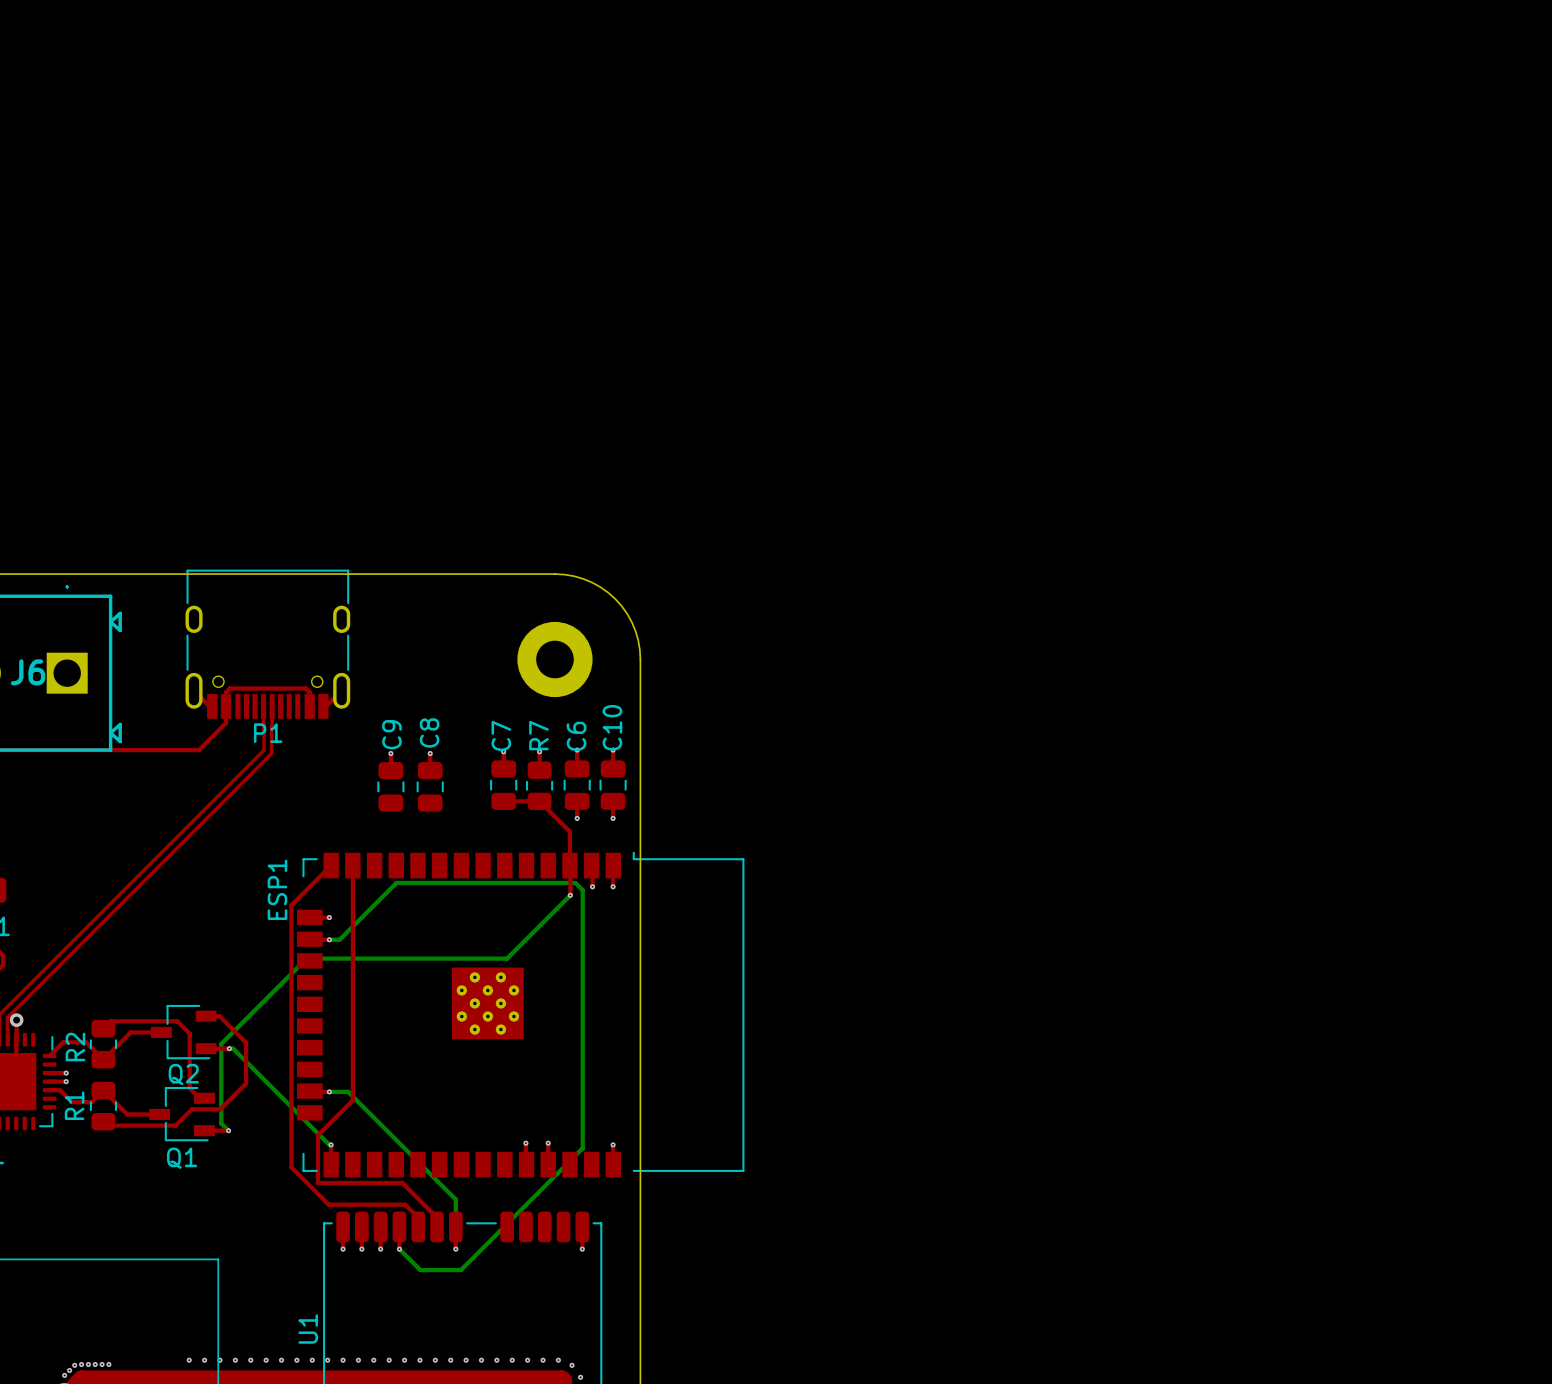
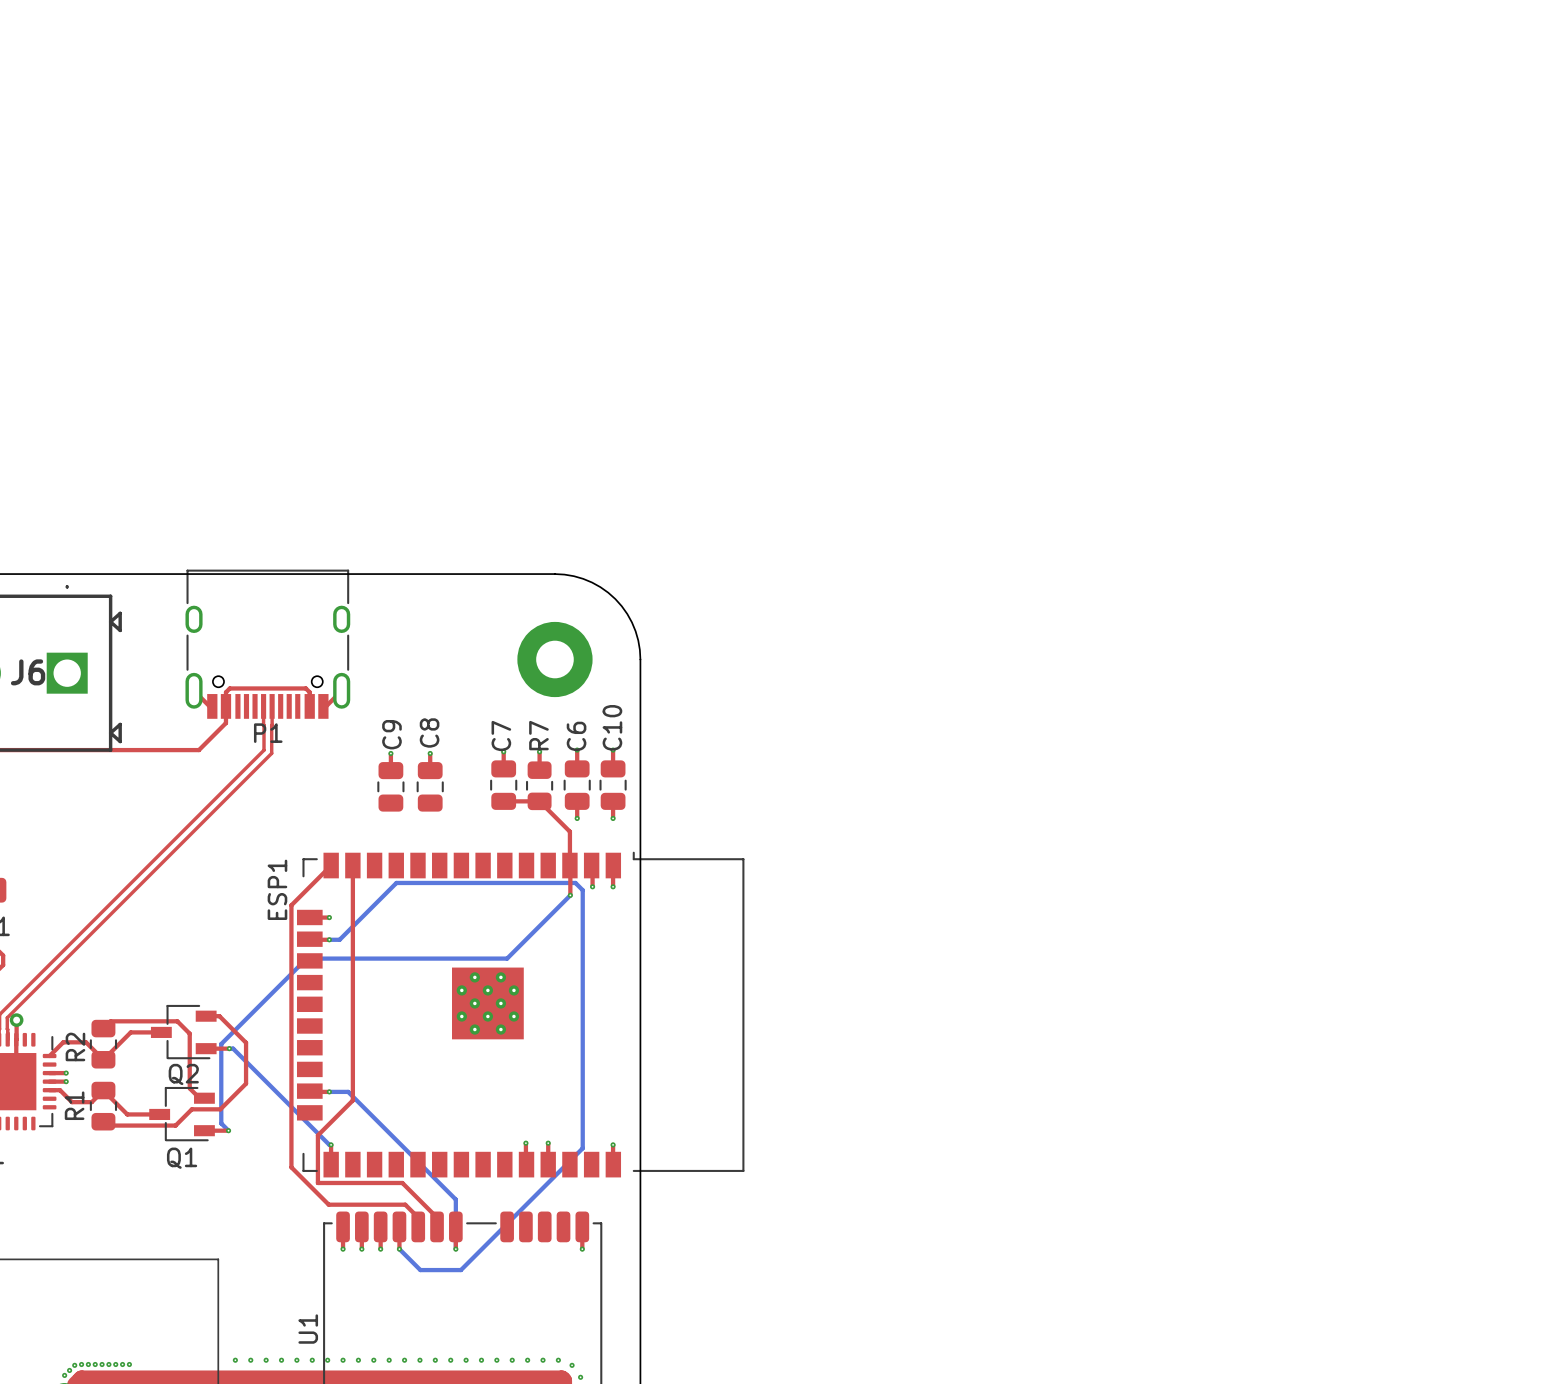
via: (189, 1360) -> none
via: (204, 1360) -> none
via: (219, 1360) -> none
via: none -> (115, 1364)
via: none -> (122, 1364)
via: none -> (129, 1364)

